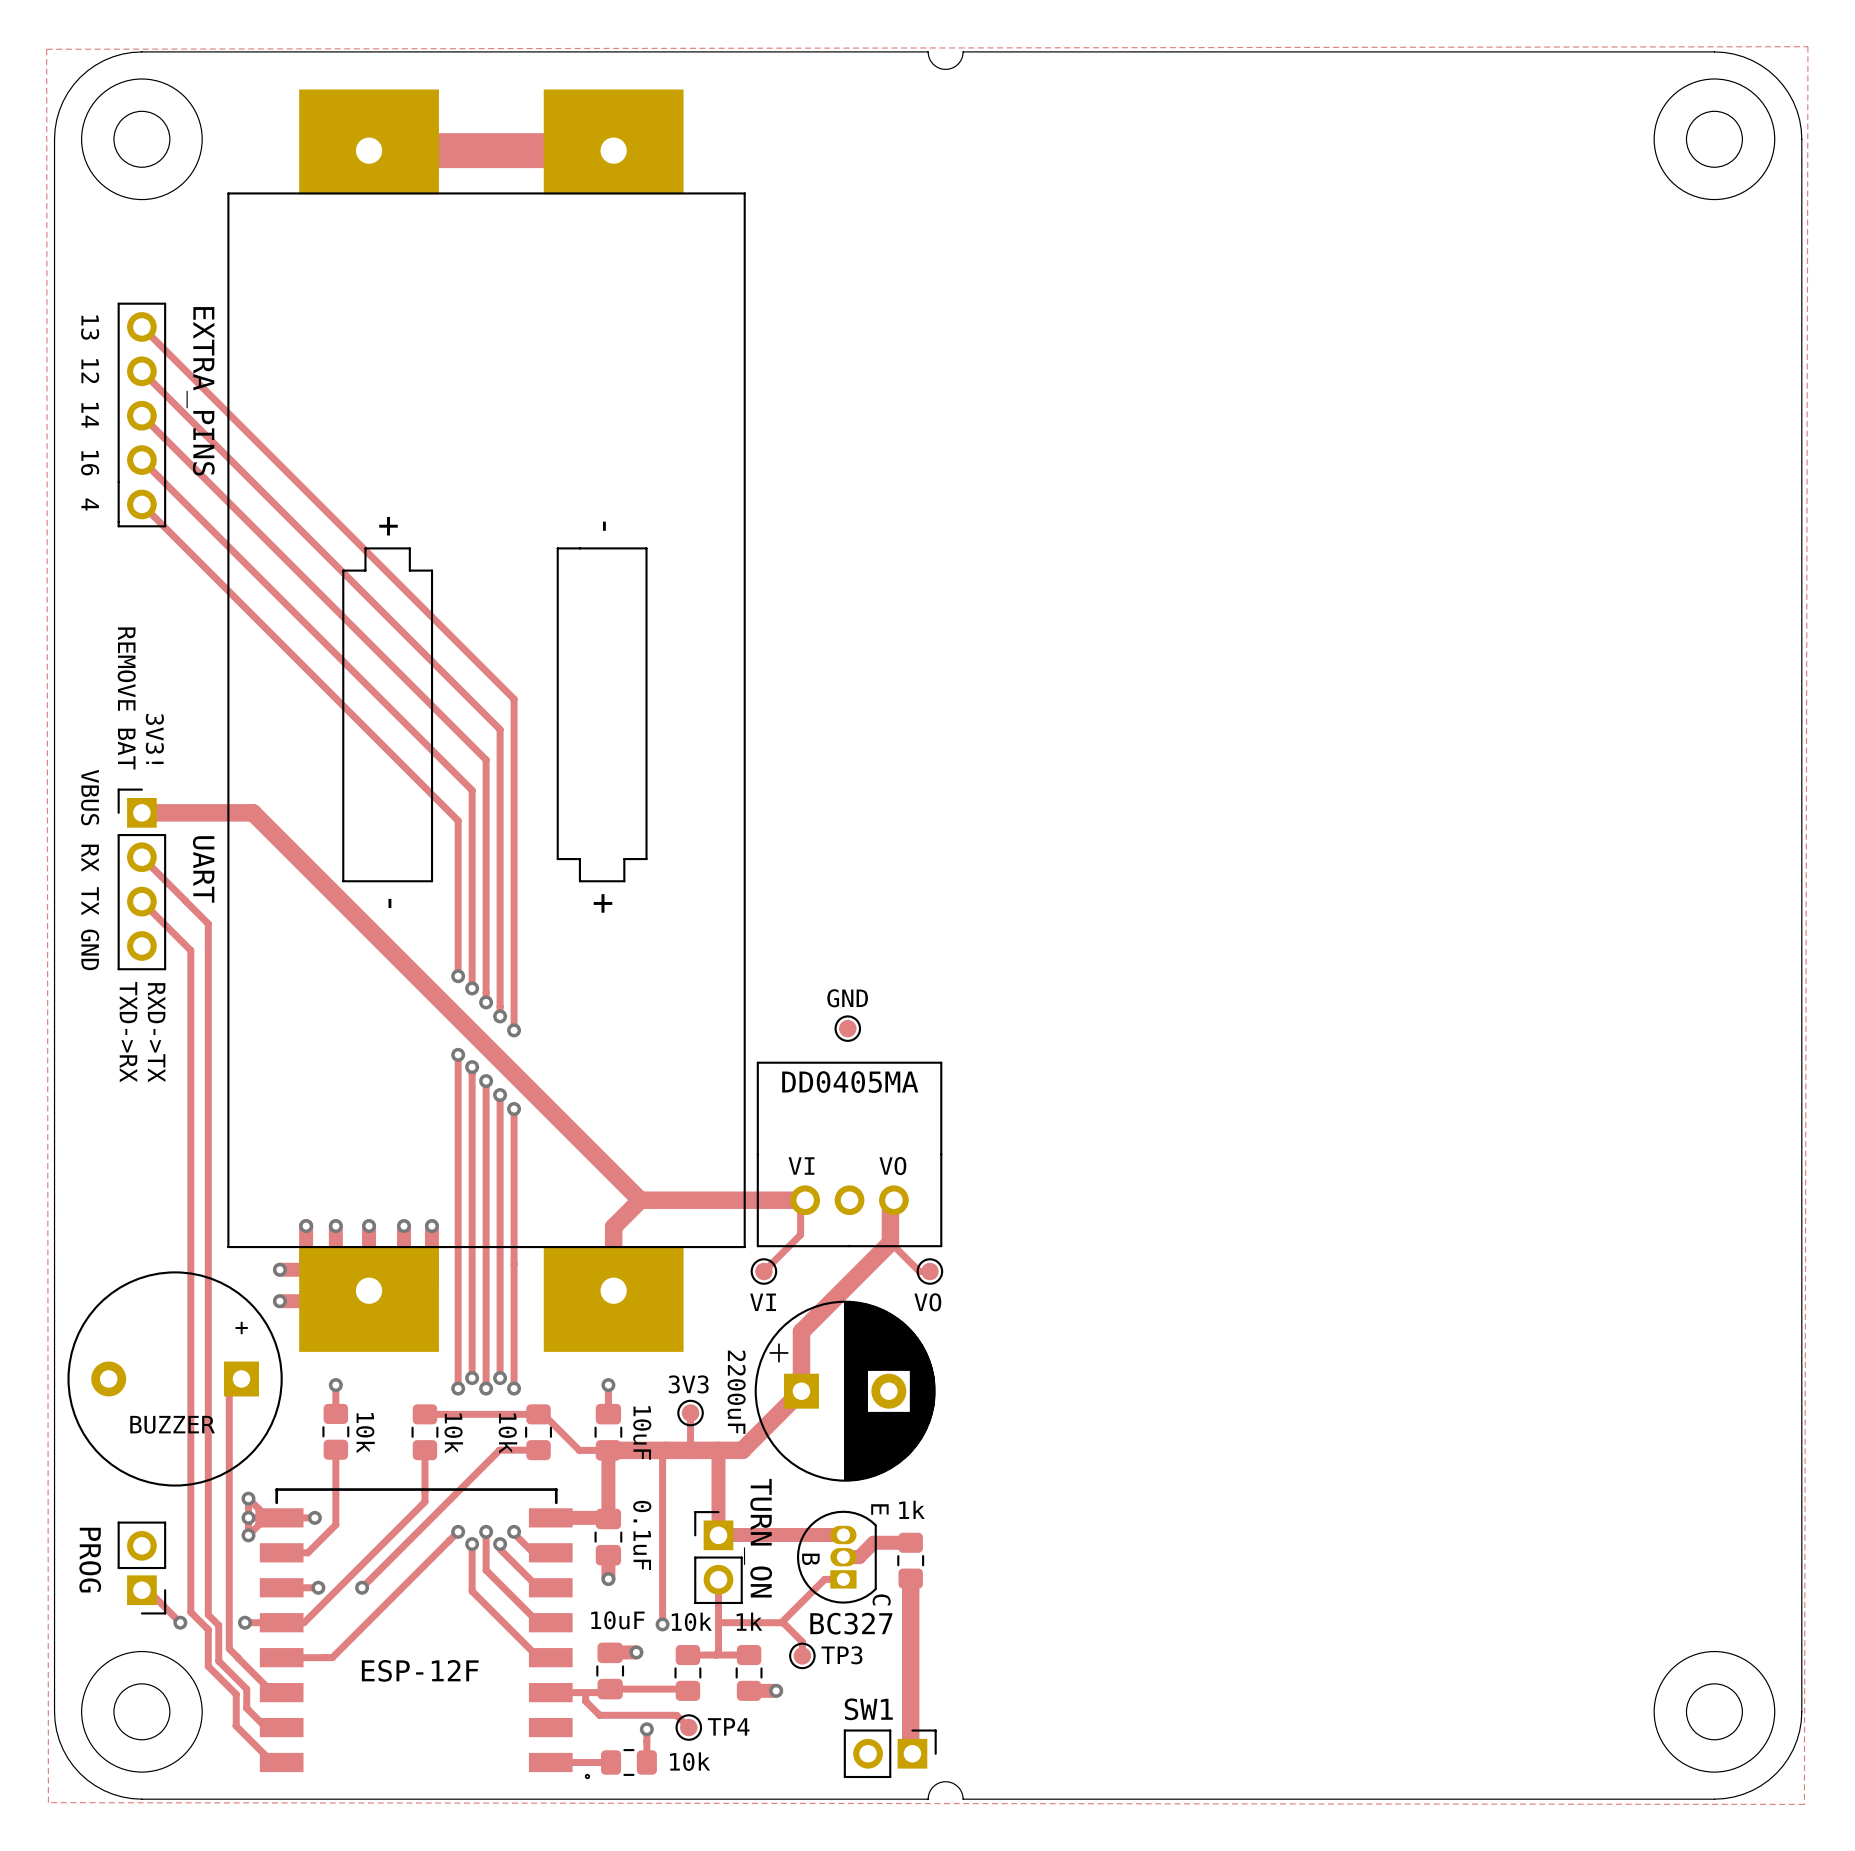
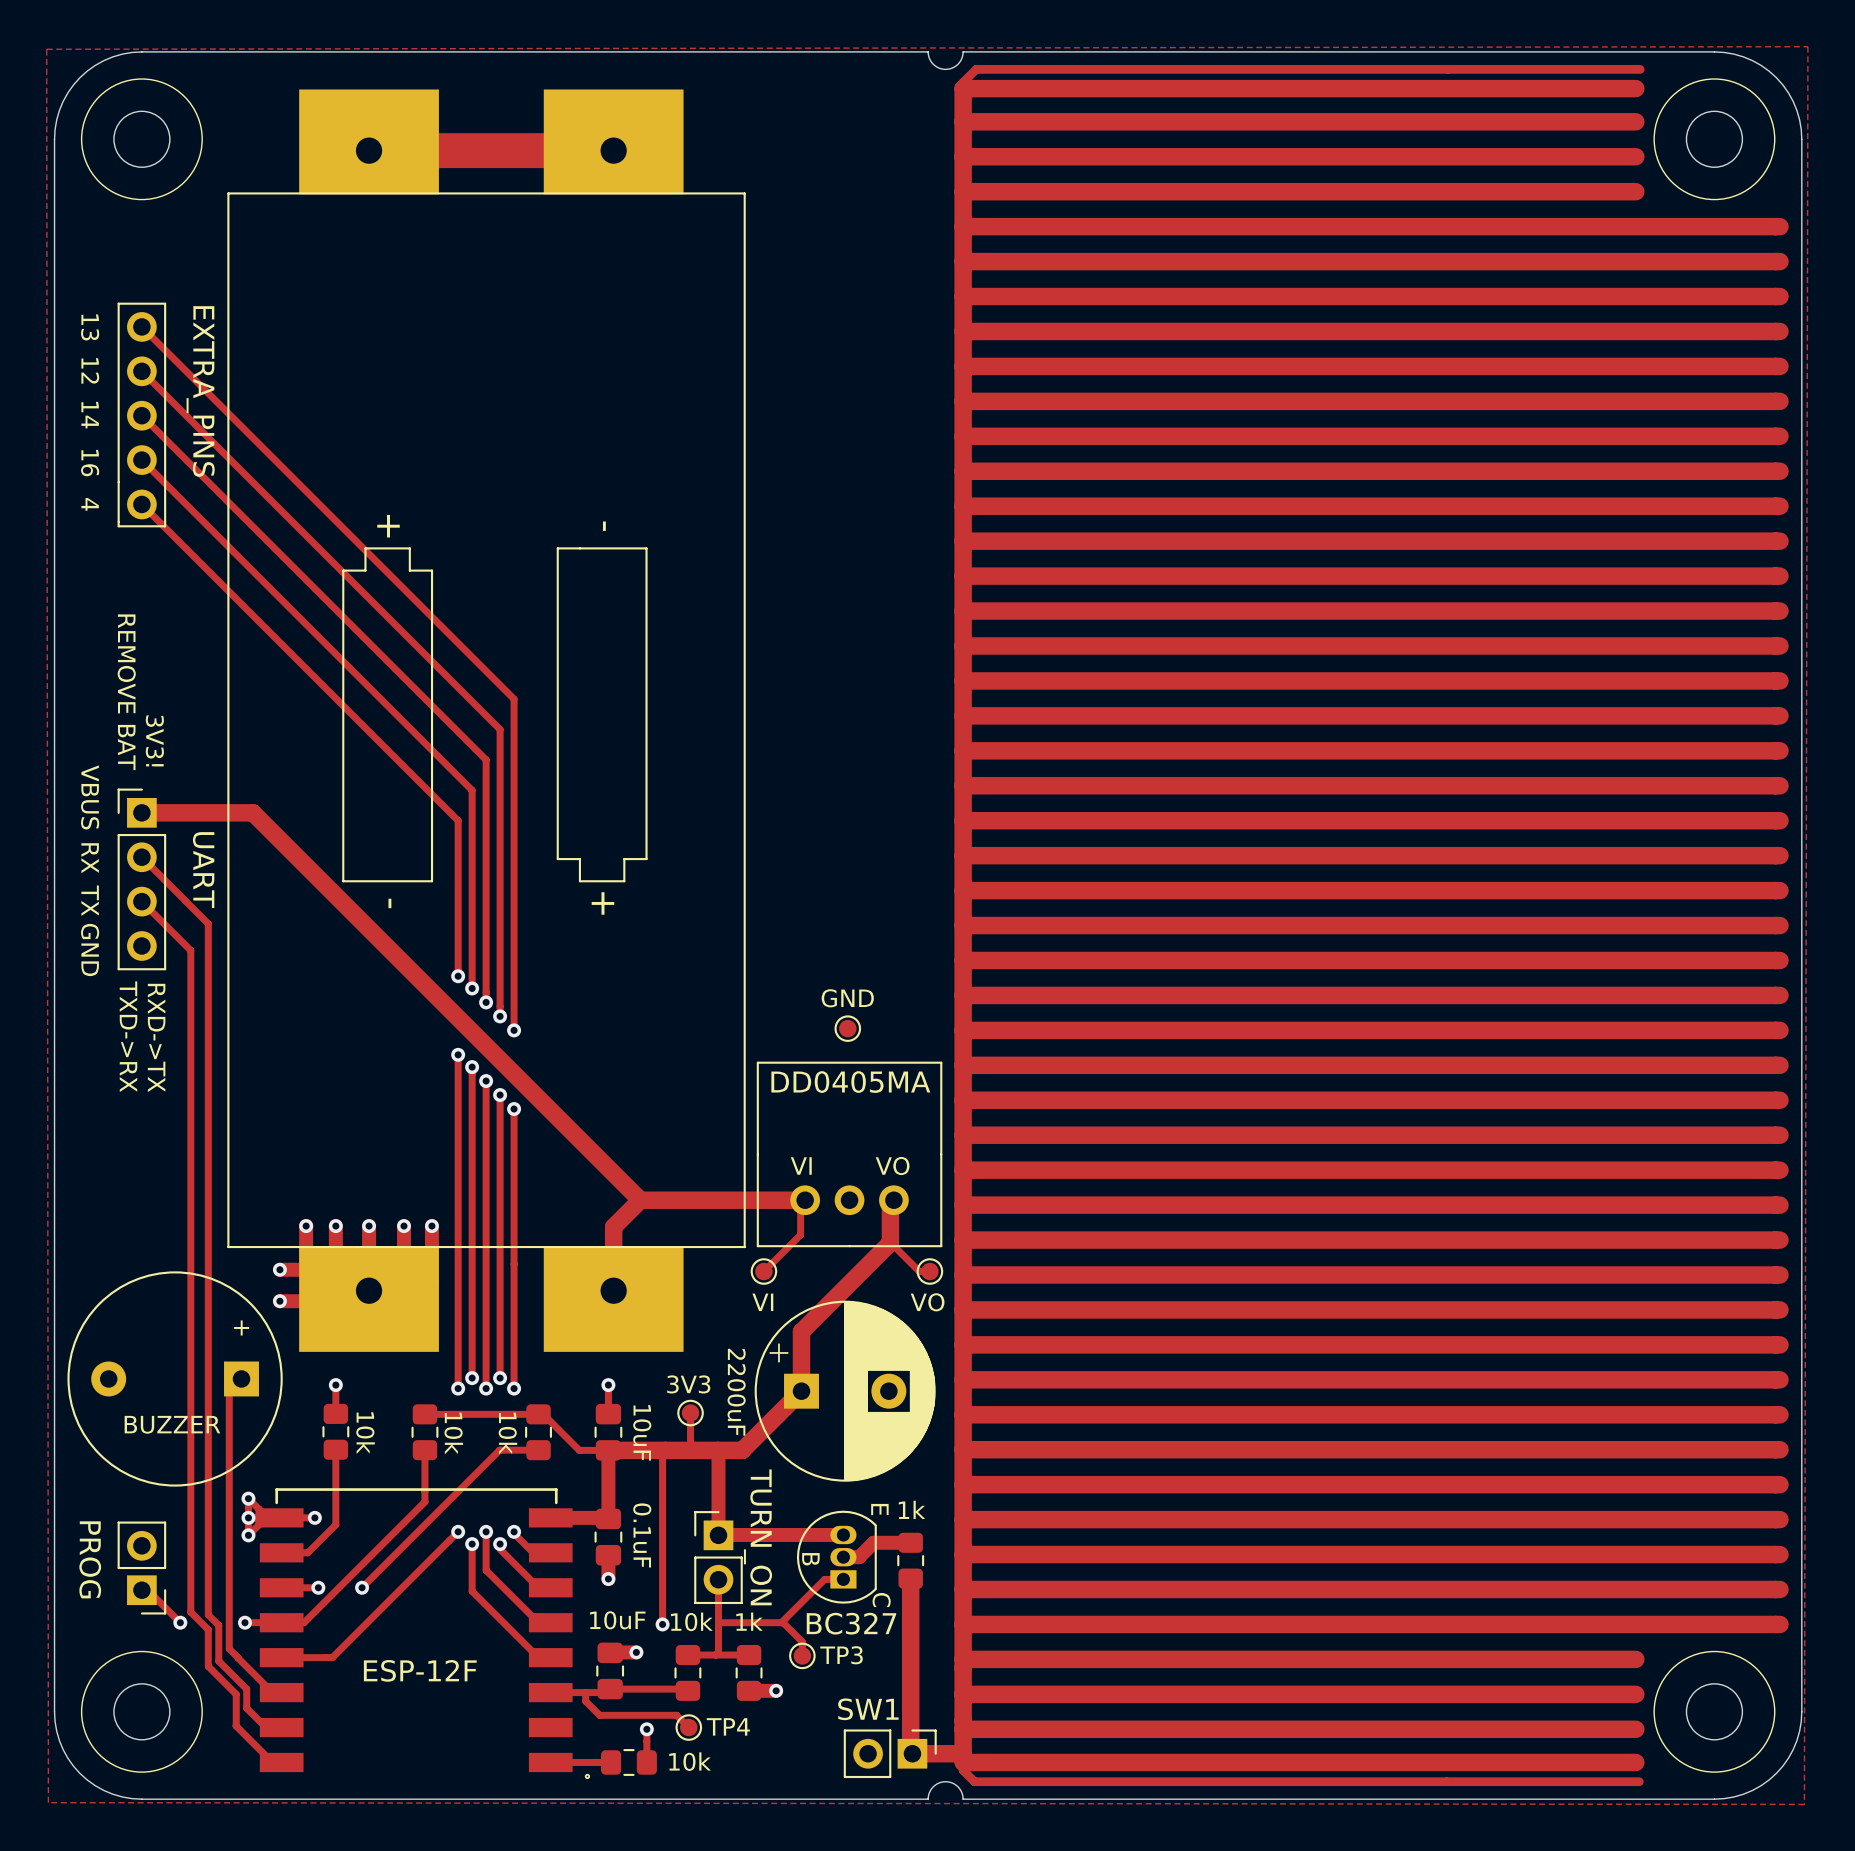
track: none -> (1640, 69) (976, 69) (963, 82) (963, 88)
track: none -> (963, 88) (963, 1753) (912, 1753)
track: none -> (963, 88) (1635, 88)
track: none -> (963, 121) (1635, 121)
track: none -> (963, 156) (1635, 156)
track: none -> (963, 191) (1635, 191)
track: none -> (963, 226) (1779, 226)
track: none -> (963, 261) (1779, 261)
track: none -> (963, 296) (1779, 296)
track: none -> (963, 331) (1779, 331)
track: none -> (963, 366) (1779, 366)
track: none -> (963, 401) (1779, 401)
track: none -> (963, 436) (1779, 436)
track: none -> (963, 471) (1779, 471)
track: none -> (963, 506) (1779, 506)
track: none -> (963, 541) (1779, 541)
track: none -> (963, 576) (1779, 576)
track: none -> (963, 611) (1779, 611)
track: none -> (963, 645) (1779, 645)
track: none -> (963, 680) (1779, 680)
track: none -> (963, 715) (1779, 715)
track: none -> (963, 750) (1779, 750)
track: none -> (963, 785) (1779, 785)
track: none -> (963, 820) (1779, 820)
track: none -> (963, 855) (1779, 855)
track: none -> (963, 890) (1779, 890)
track: none -> (963, 925) (1779, 925)
track: none -> (963, 960) (1779, 960)
track: none -> (963, 995) (1779, 995)
track: none -> (963, 1030) (1779, 1030)
track: none -> (963, 1065) (1779, 1065)
track: none -> (963, 1100) (1779, 1100)
track: none -> (963, 1135) (1779, 1135)
track: none -> (963, 1170) (1779, 1170)
track: none -> (963, 1205) (1779, 1205)
track: none -> (963, 1240) (1779, 1240)
track: none -> (963, 1275) (1779, 1275)
track: none -> (963, 1309) (1779, 1309)
track: none -> (963, 1344) (1779, 1344)
track: none -> (963, 1379) (1779, 1379)
track: none -> (963, 1414) (1779, 1414)
track: none -> (963, 1449) (1779, 1449)
track: none -> (963, 1484) (1779, 1484)
track: none -> (963, 1519) (1779, 1519)
track: none -> (963, 1554) (1779, 1554)
track: none -> (963, 1589) (1779, 1589)
track: none -> (963, 1624) (1779, 1624)
track: none -> (963, 1659) (1635, 1659)
track: none -> (963, 1694) (1635, 1694)
track: none -> (963, 1729) (1635, 1729)
track: none -> (1635, 1762) (963, 1762) (963, 1770) (974, 1781) (1446, 1781)
track: none -> (1447, 1781) (1639, 1781)

